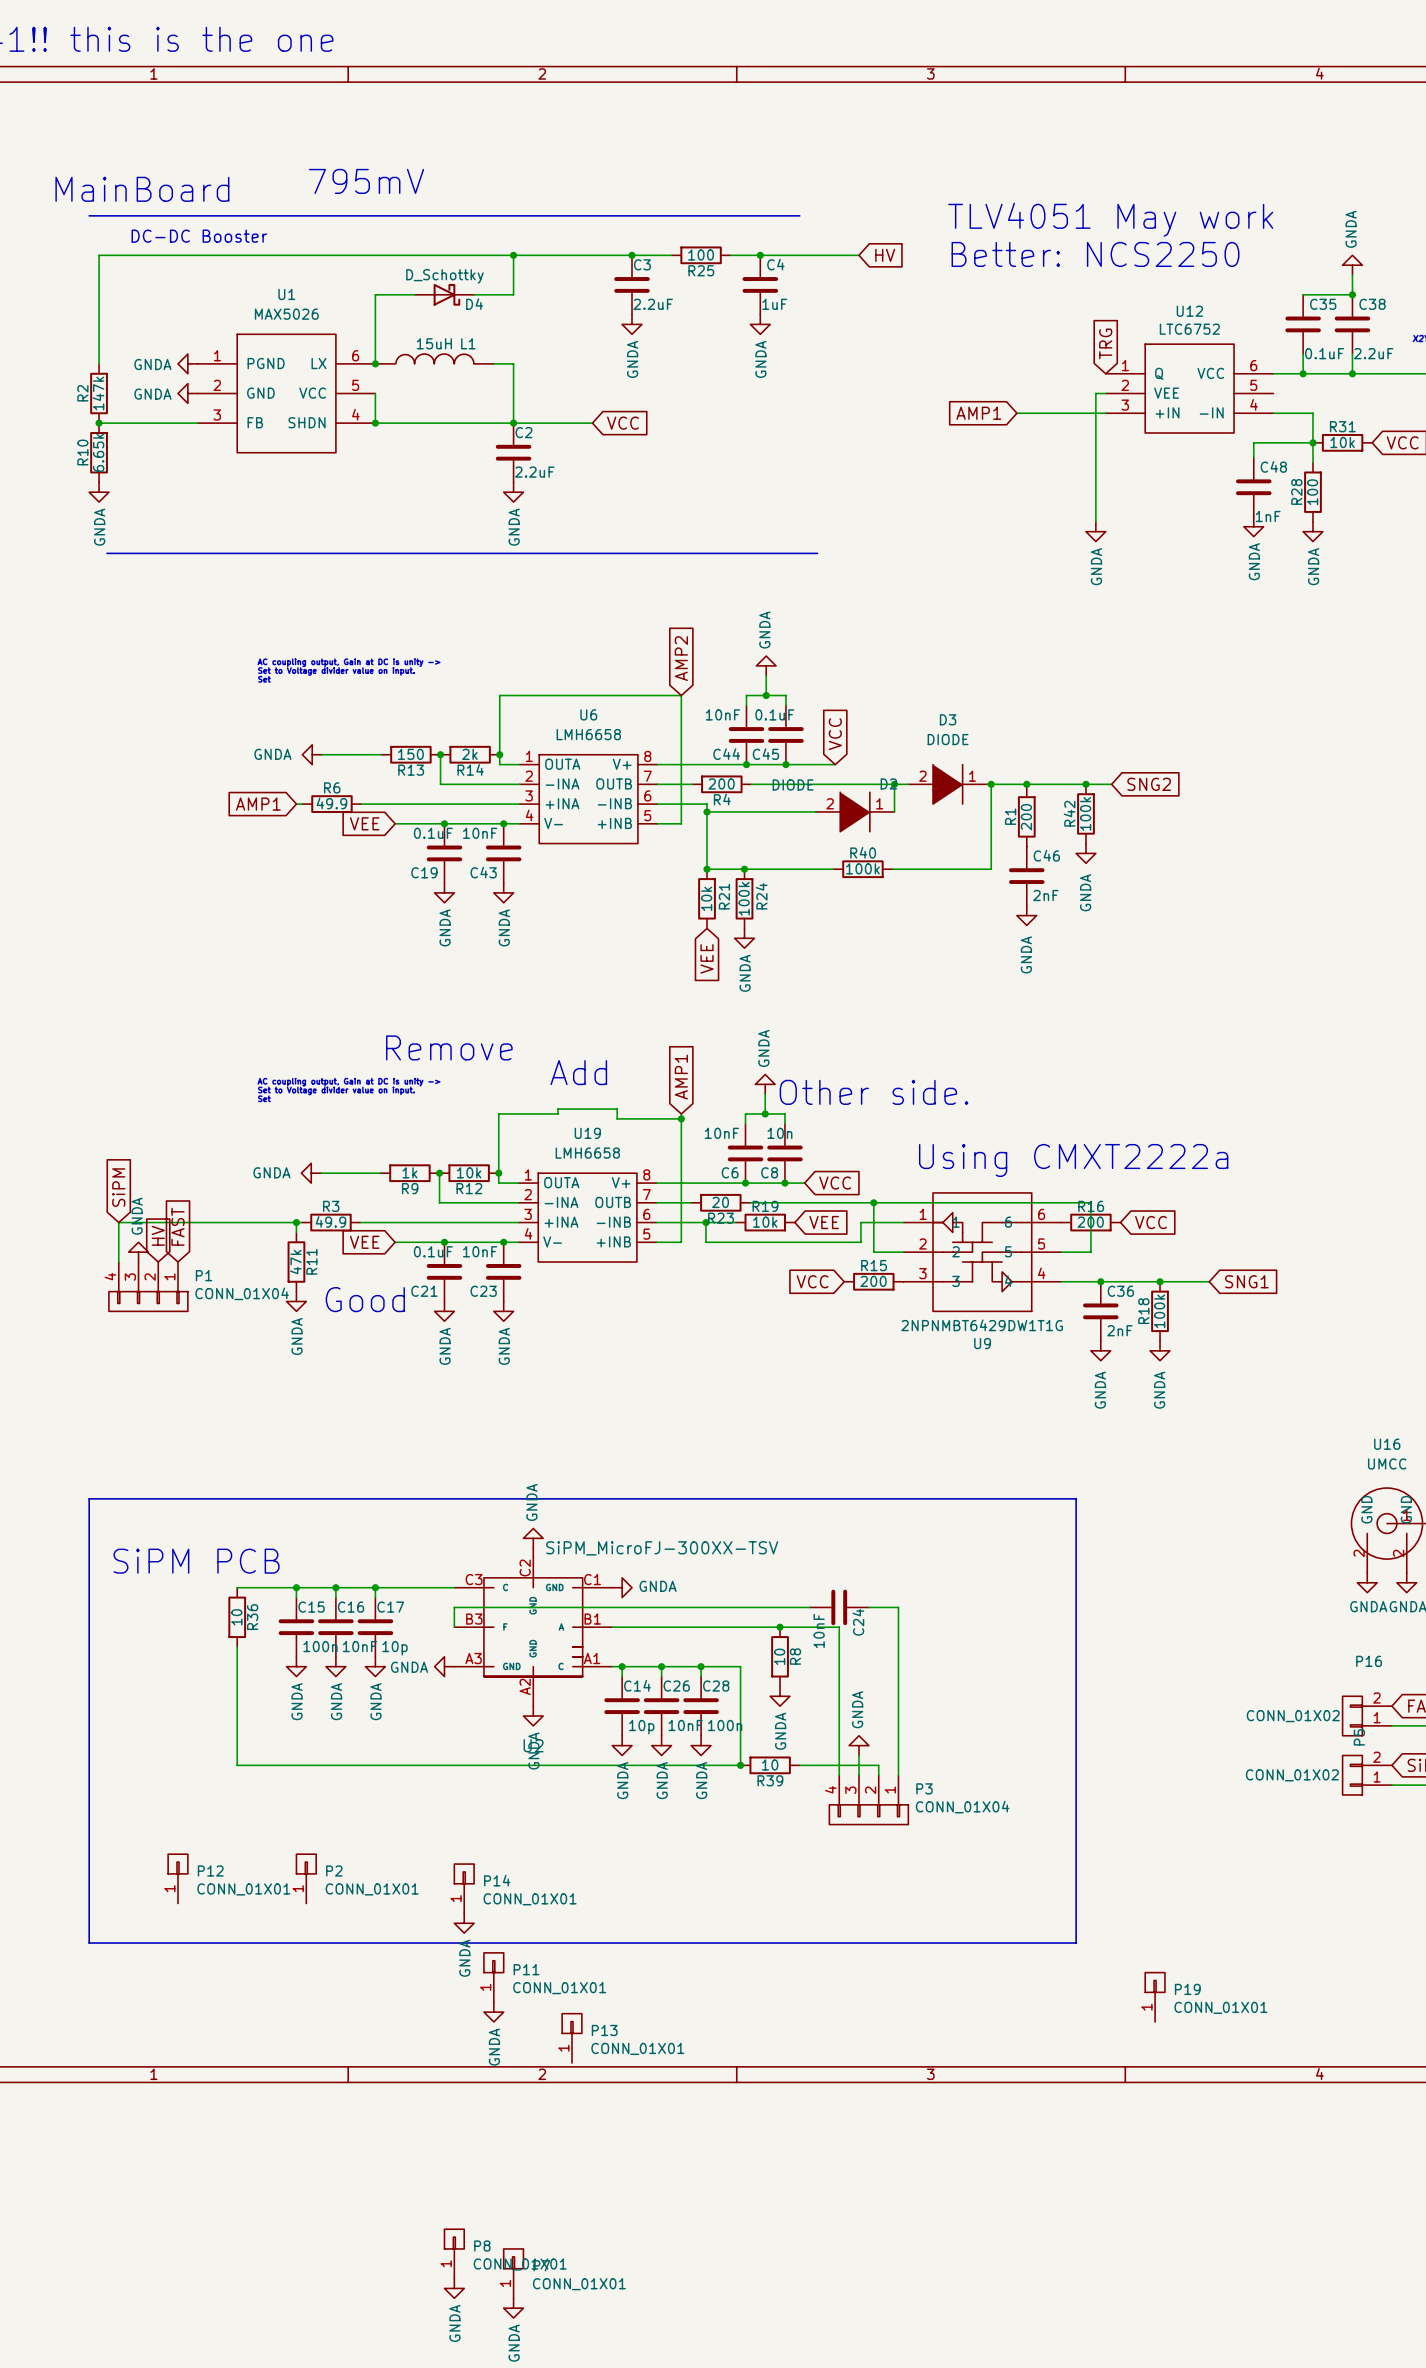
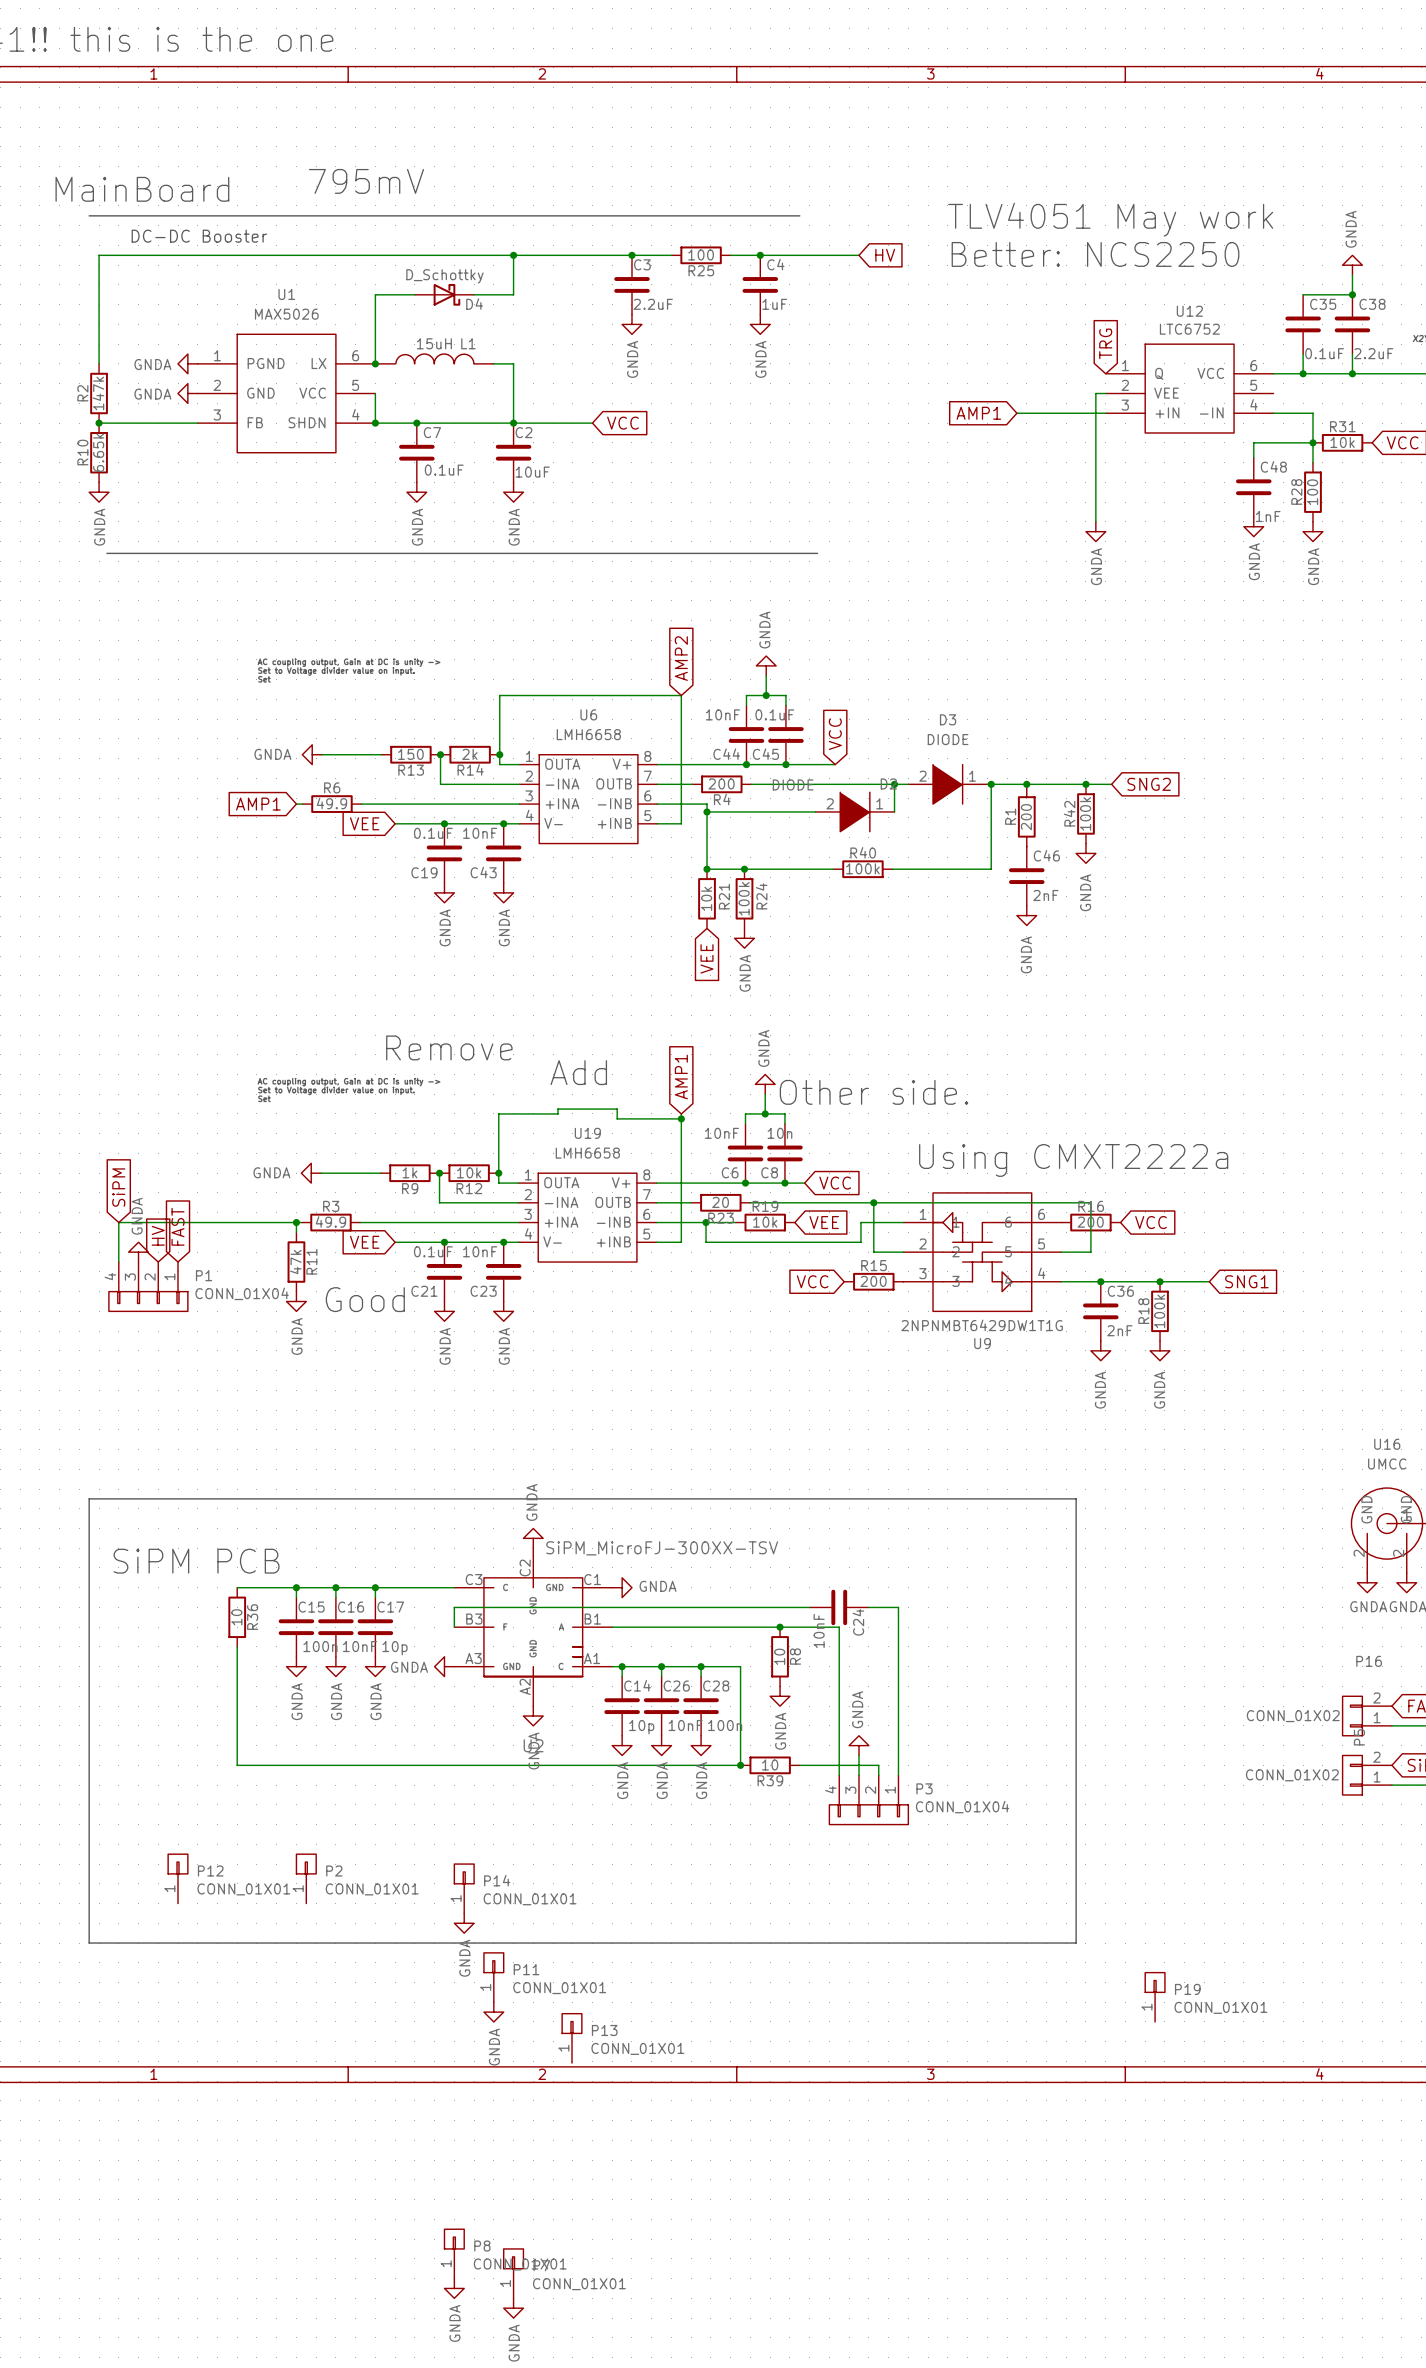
junction: none -> (416, 423)
C7: none -> 0.1uF (416, 452)
C2 value: 2.2uF (534, 472) -> 10uF (532, 472)
power symbol: none -> GNDA (416, 492)

